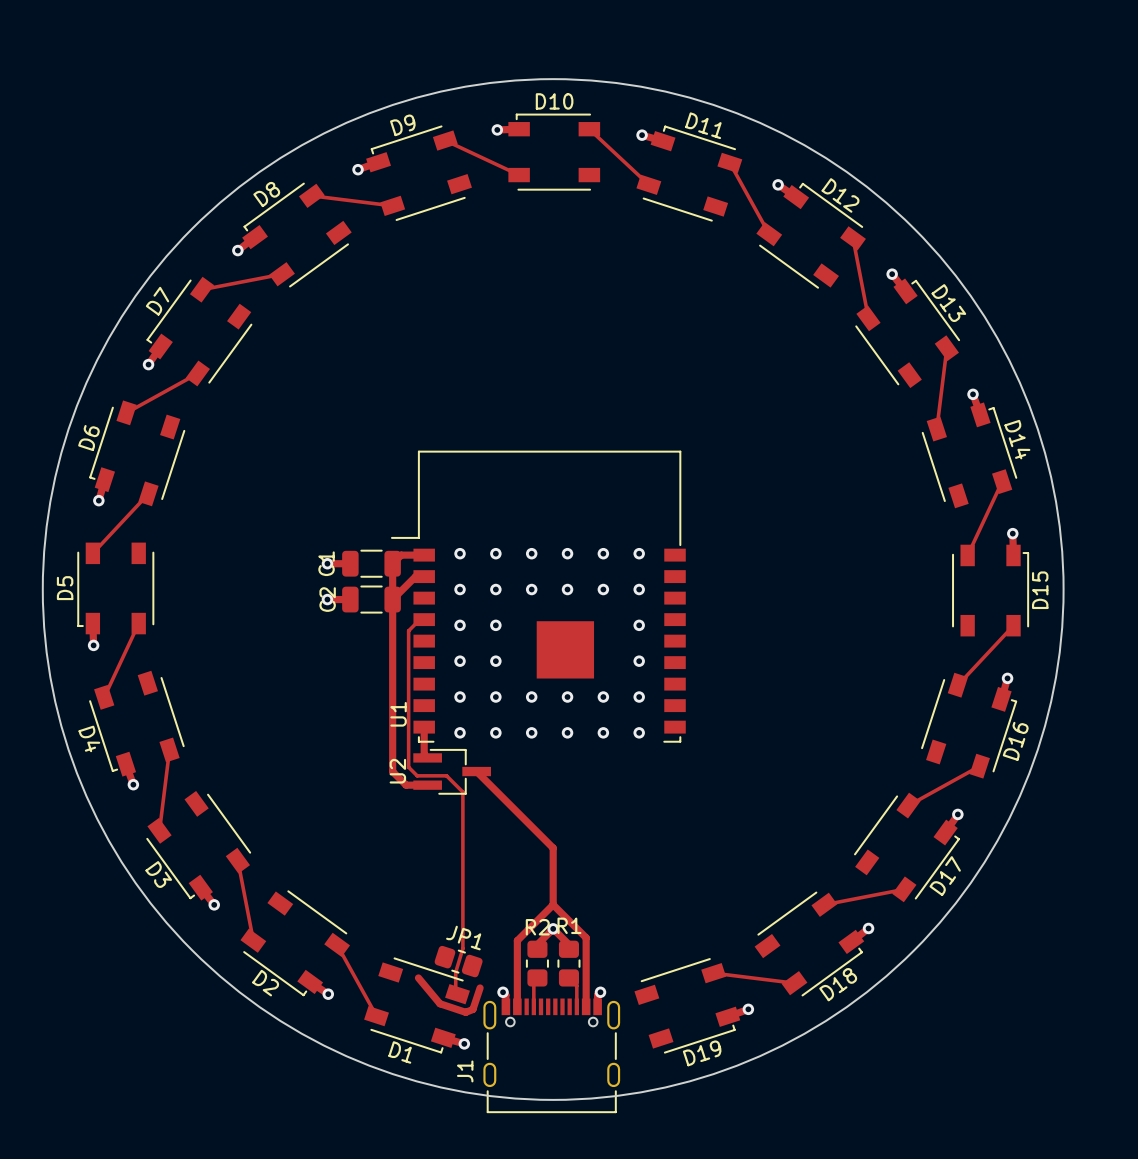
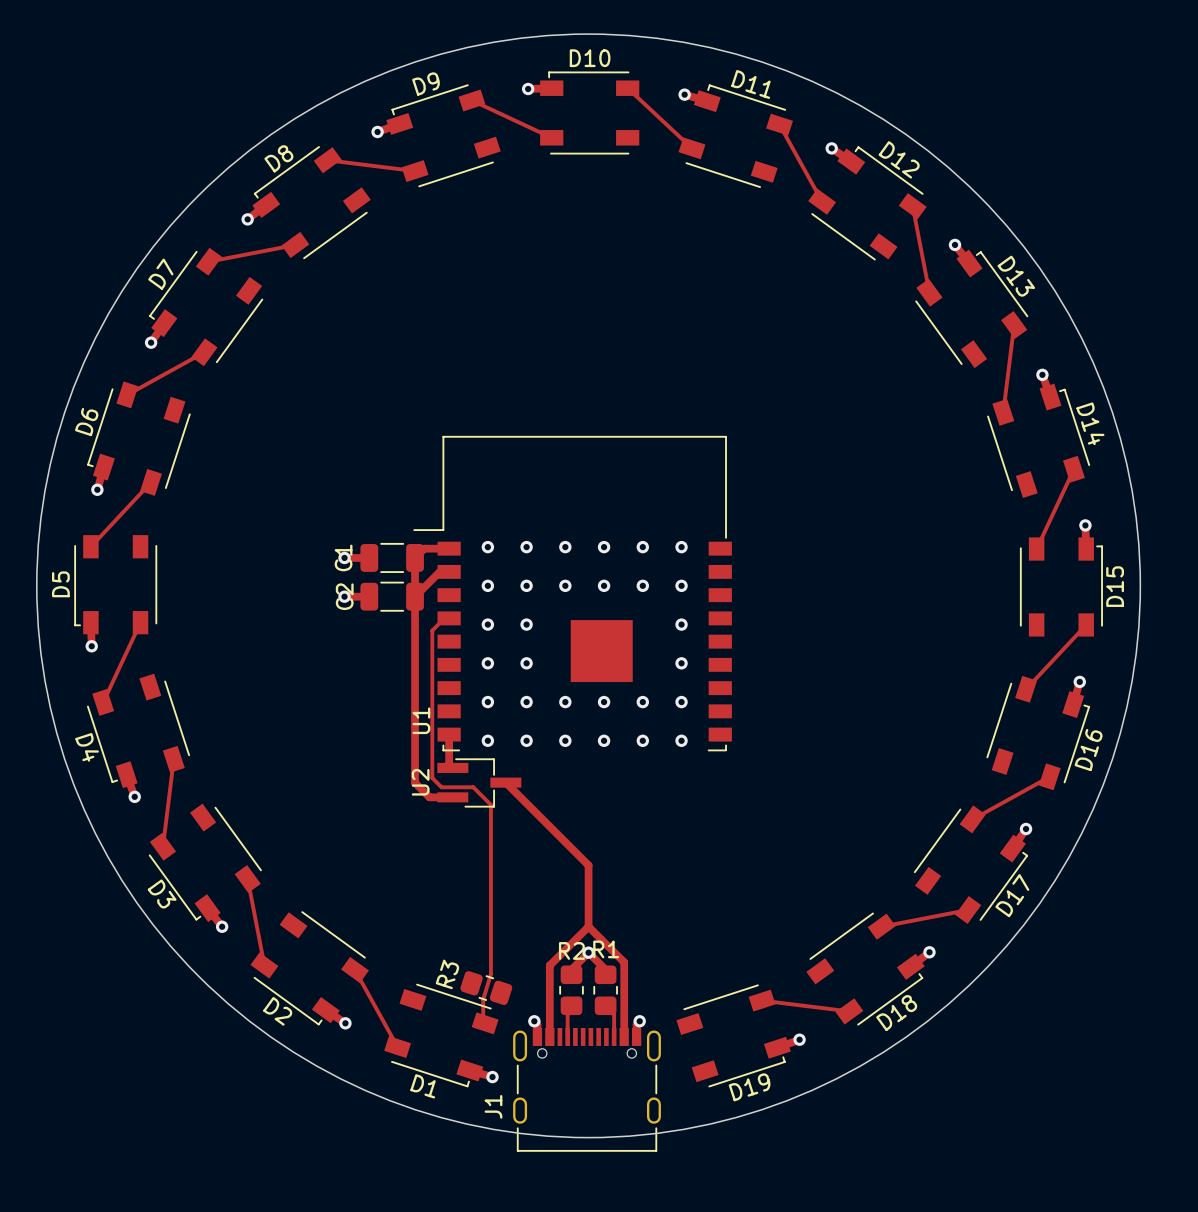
JP1 name: JP1 (463, 938) -> R3 (447, 974)
top track: (418, 977) (439, 1003) (465, 1012) (472, 1009) (480, 987) -> none

